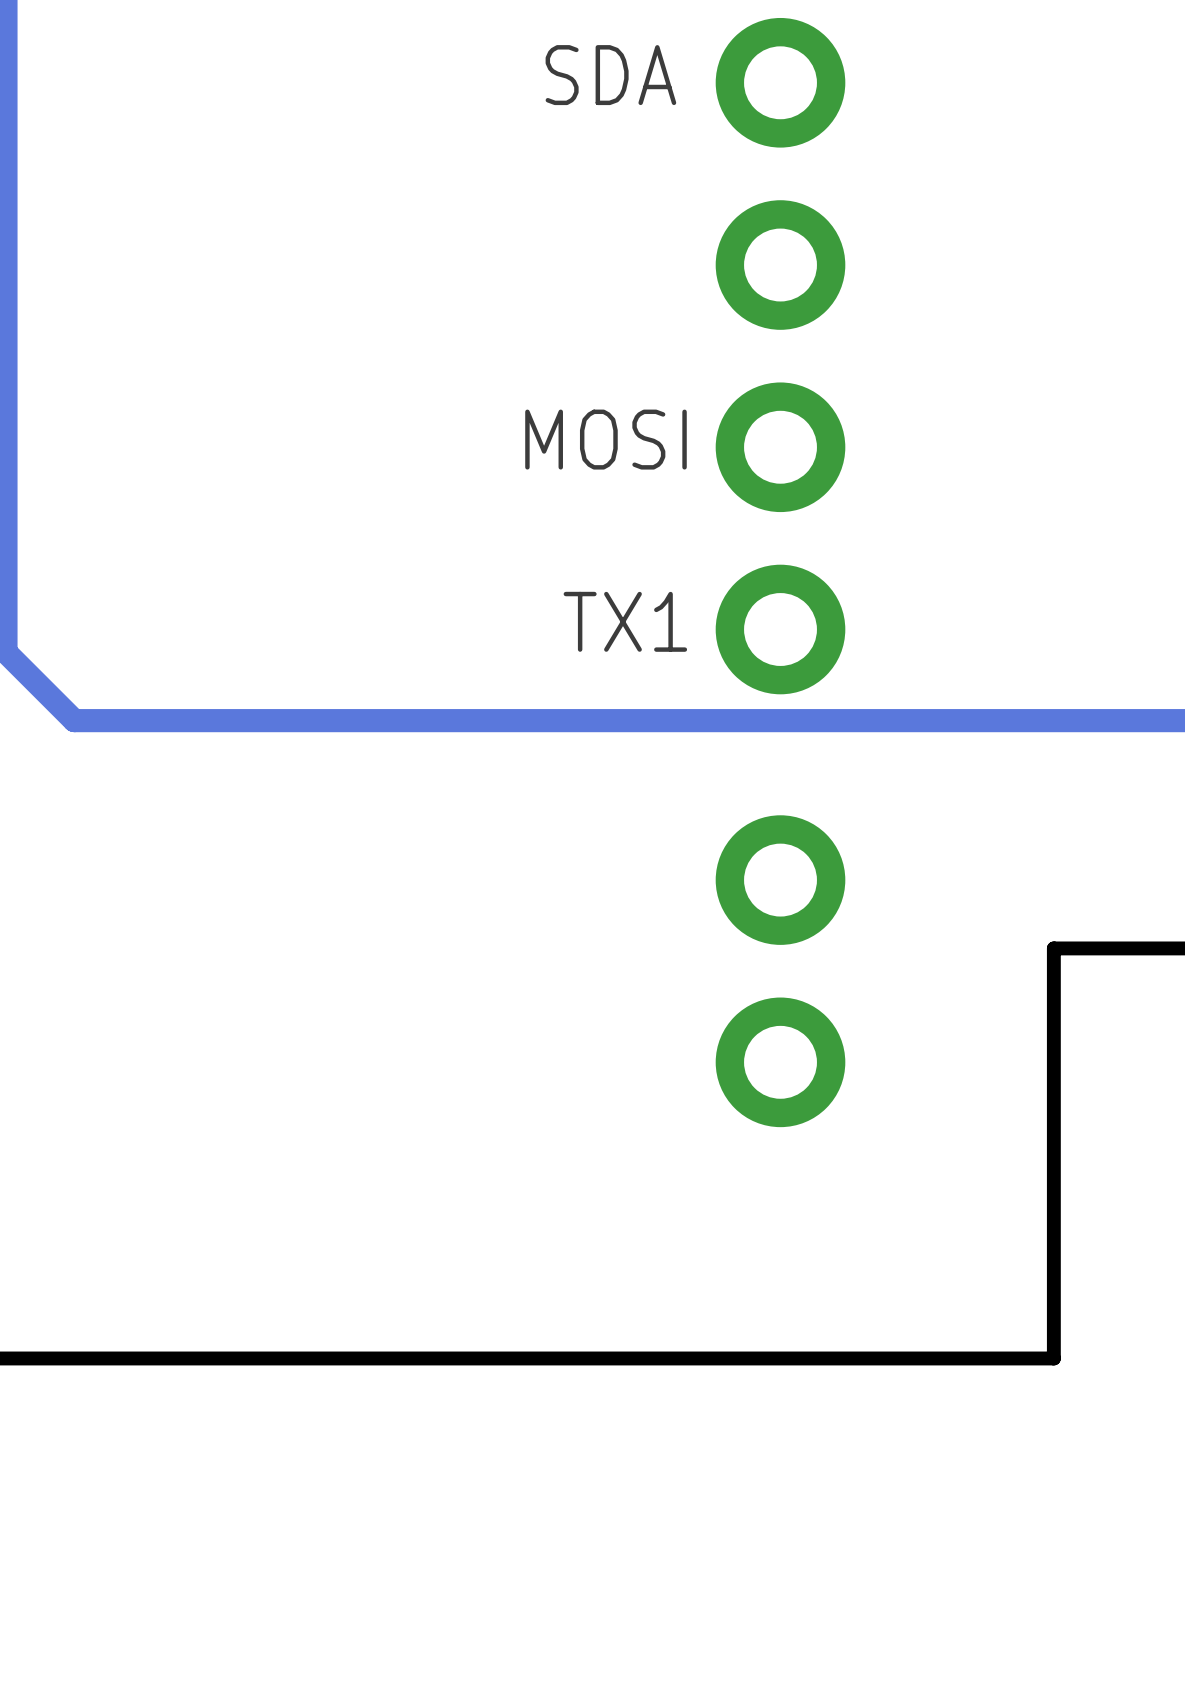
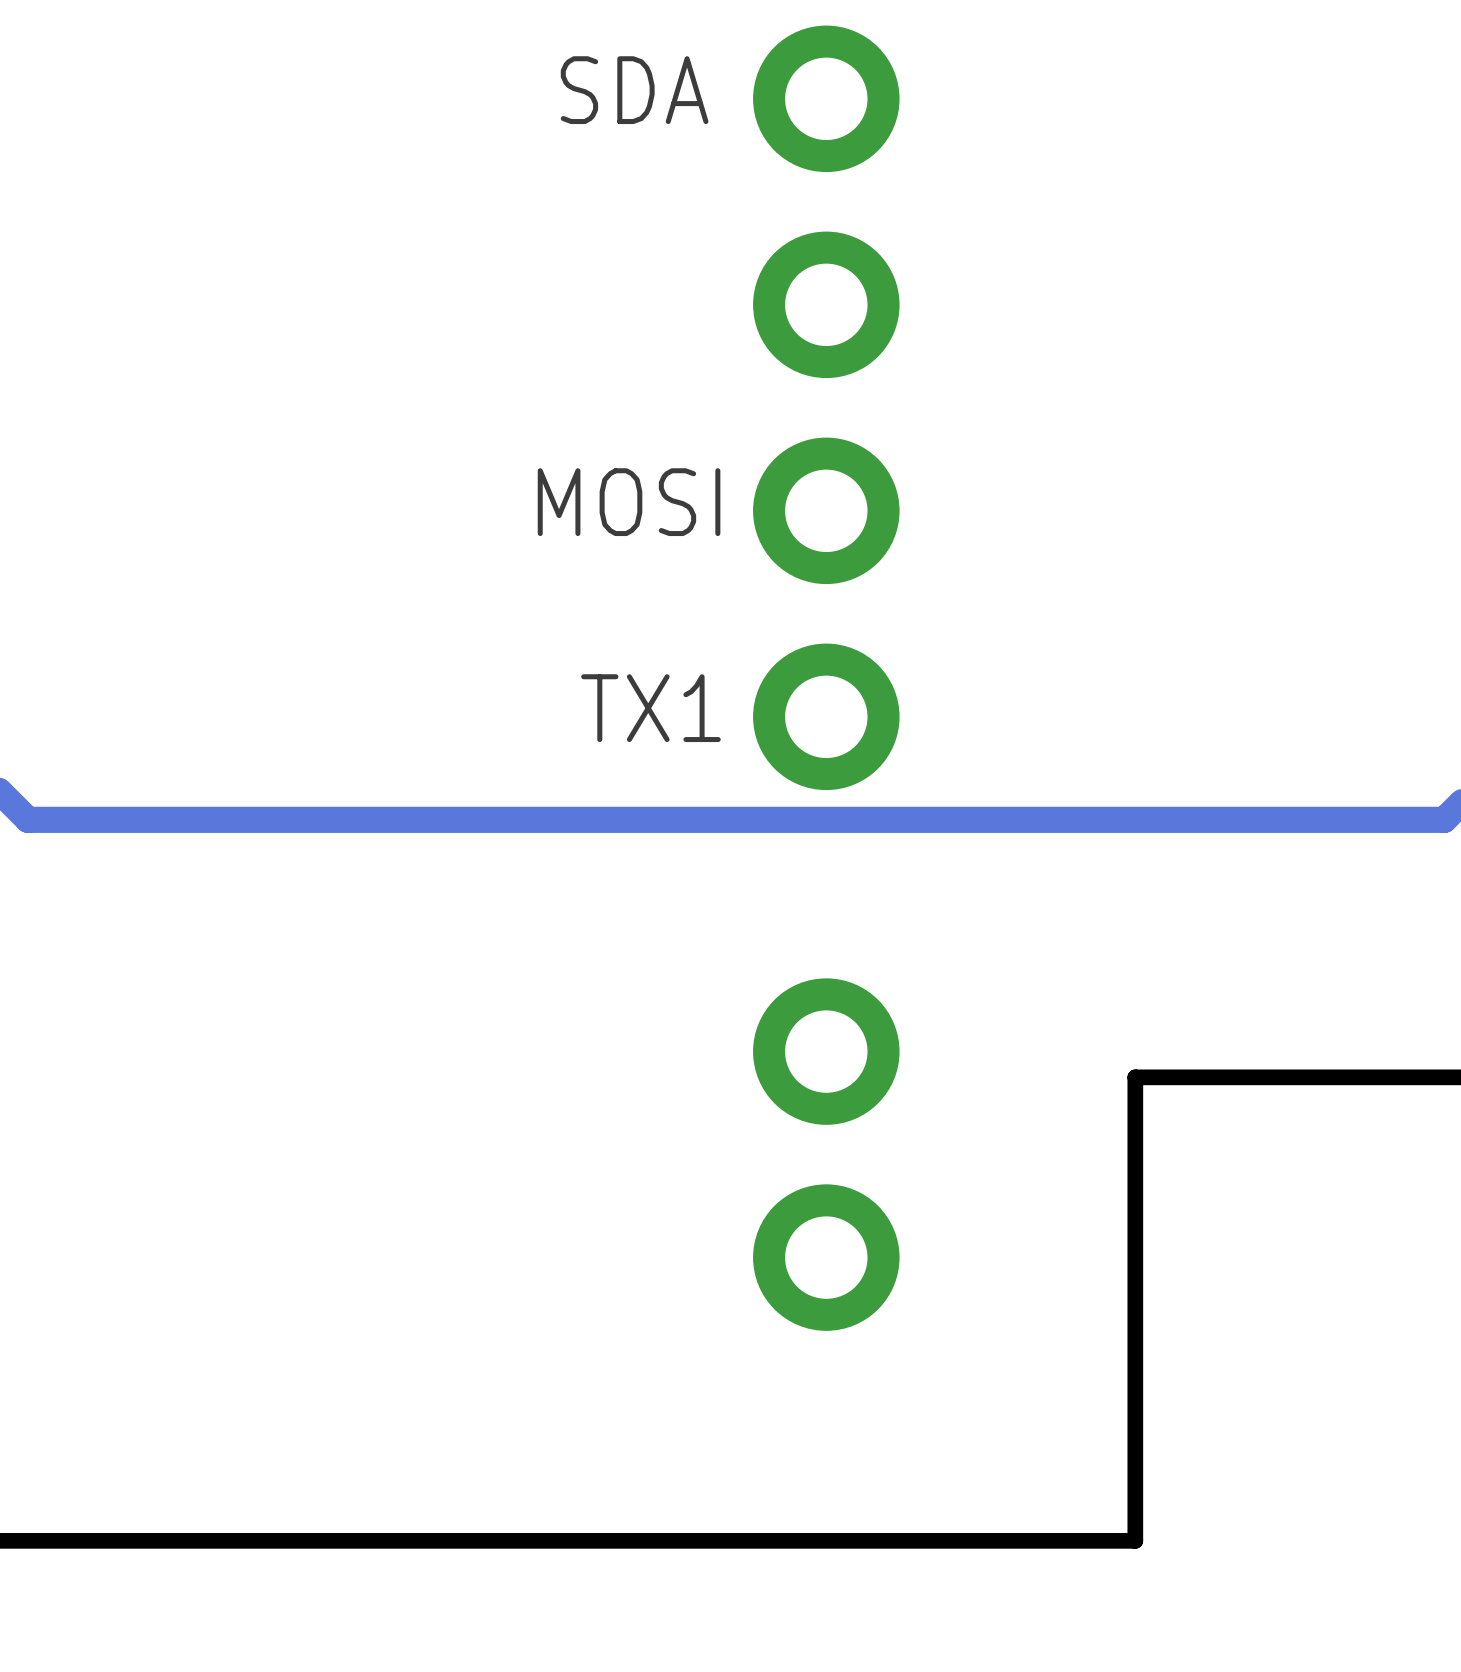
part position: (780, 971) -> (826, 1154)

